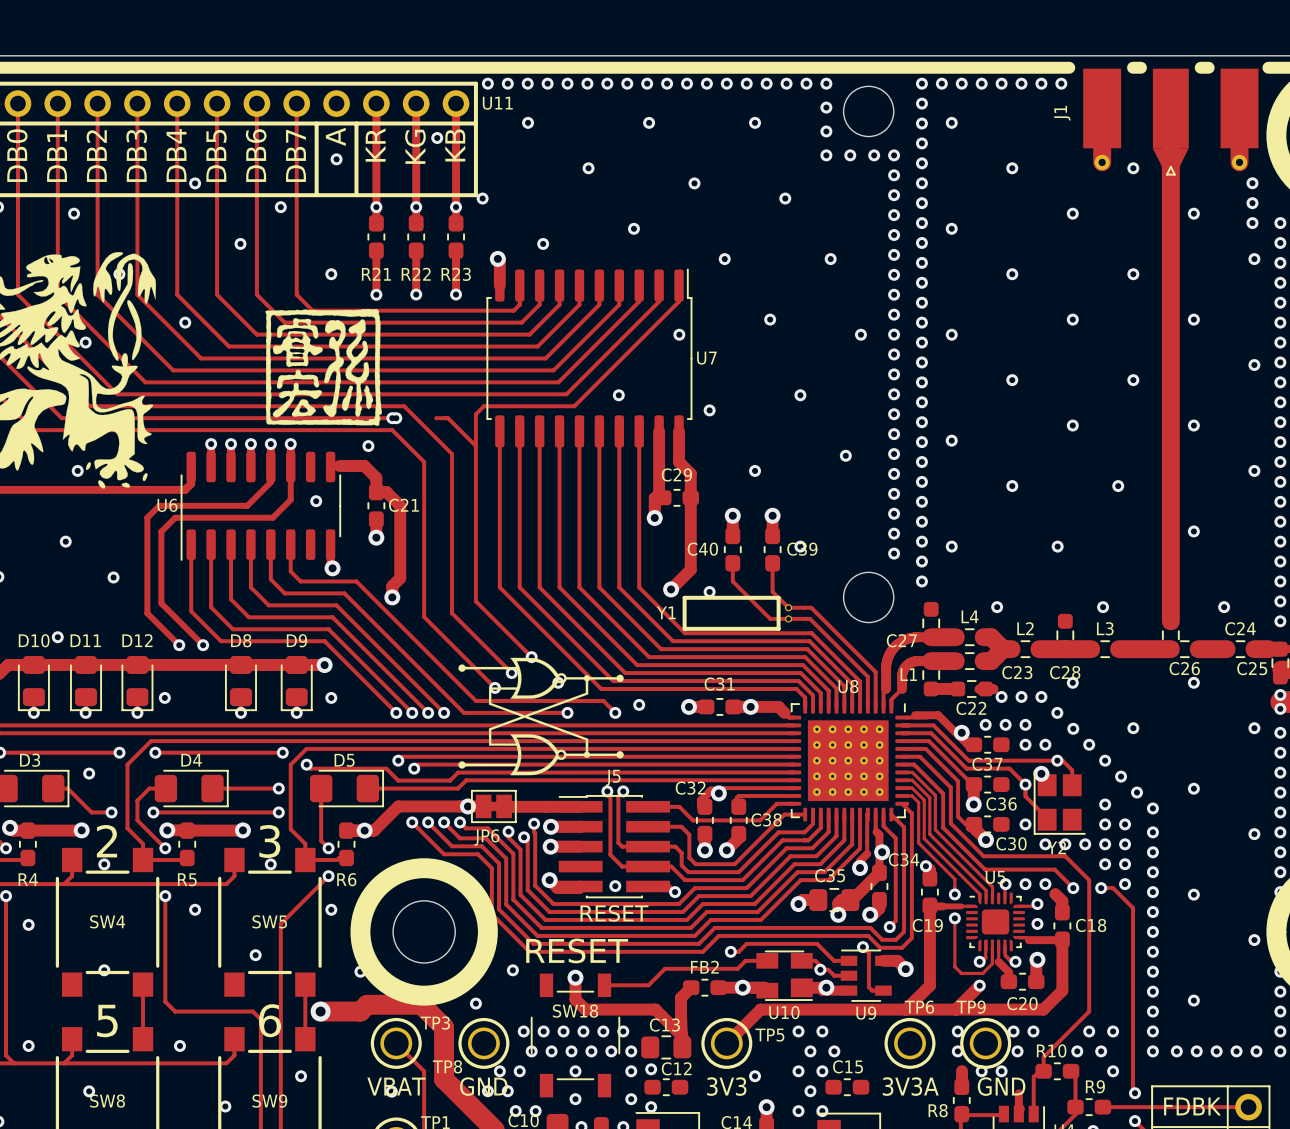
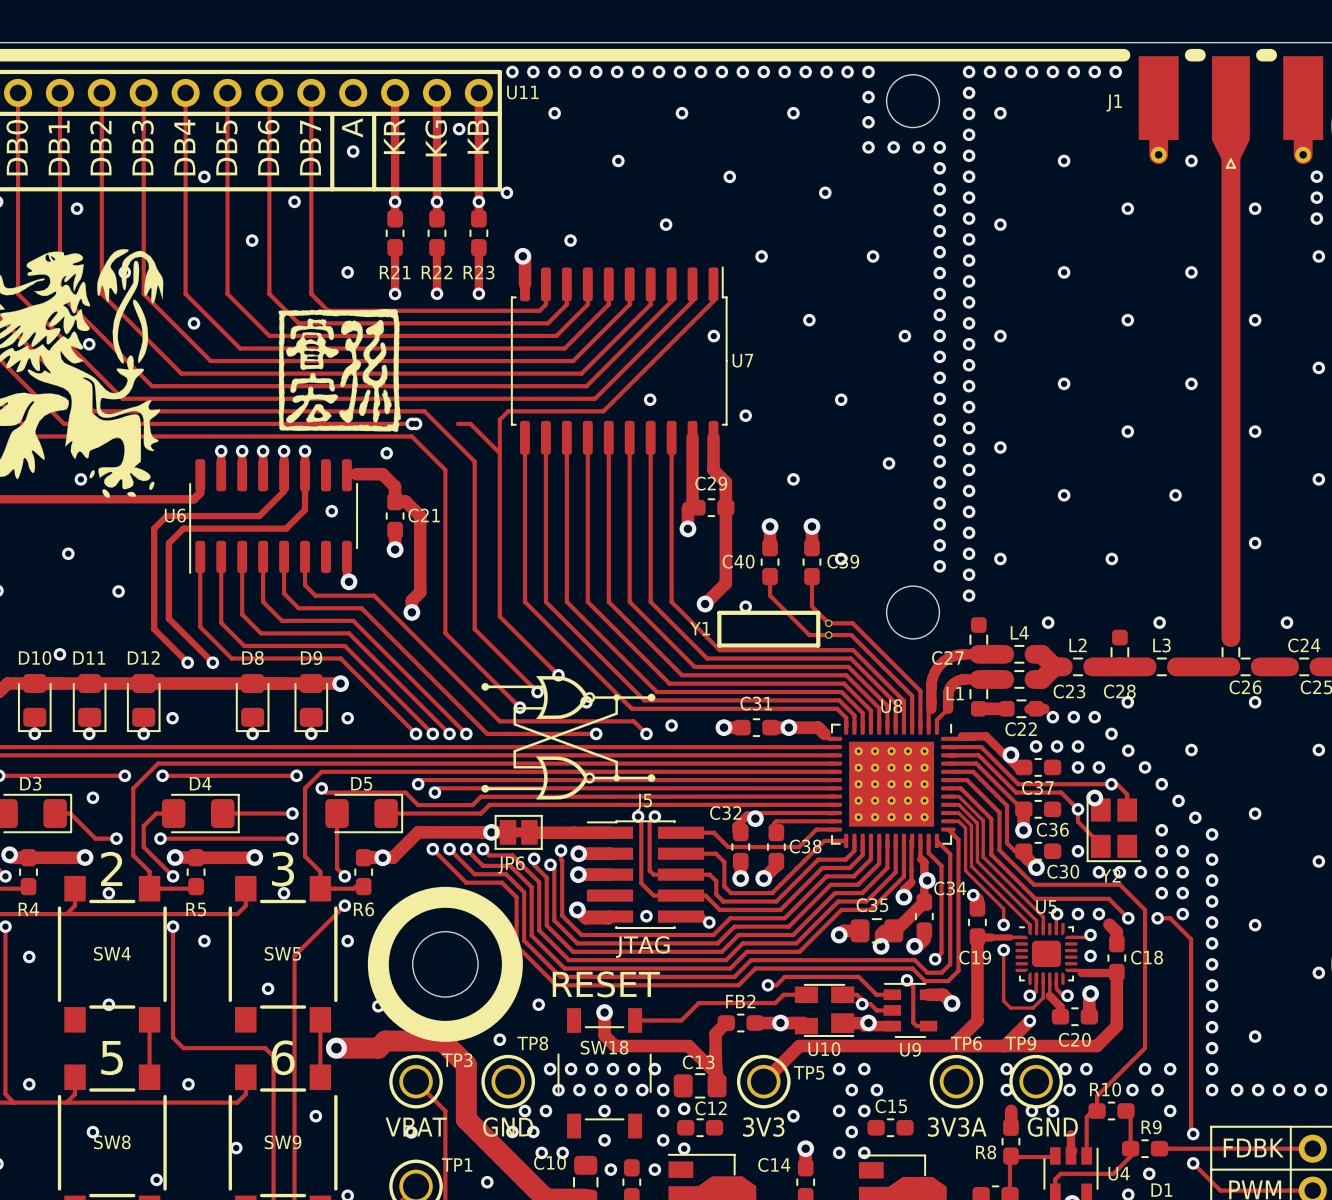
J1 name rotation: 0° (1062, 113) -> 90° clockwise (1114, 103)
text: RESET (614, 913) -> JTAG (642, 947)
TP8 name position: TP8 (447, 1066) -> TP8 (532, 1043)

